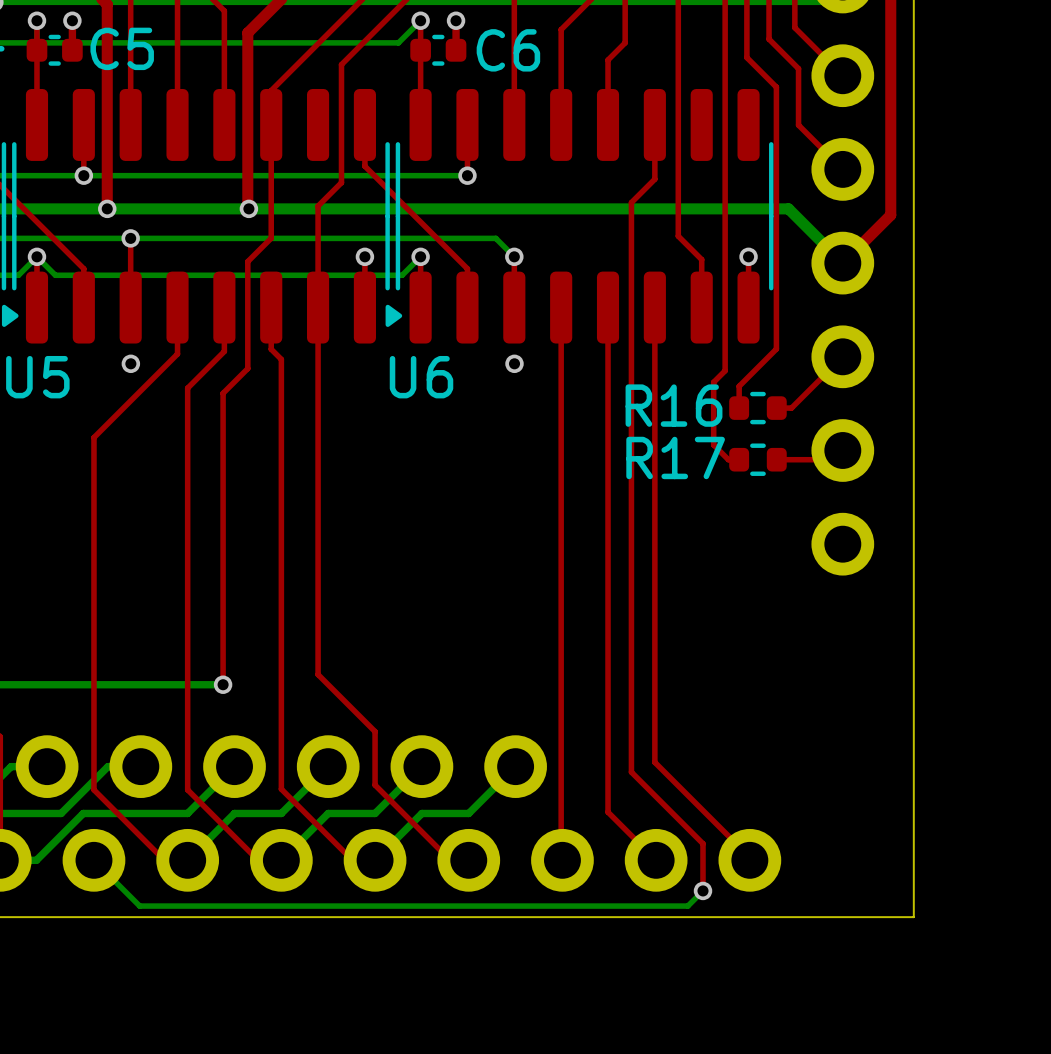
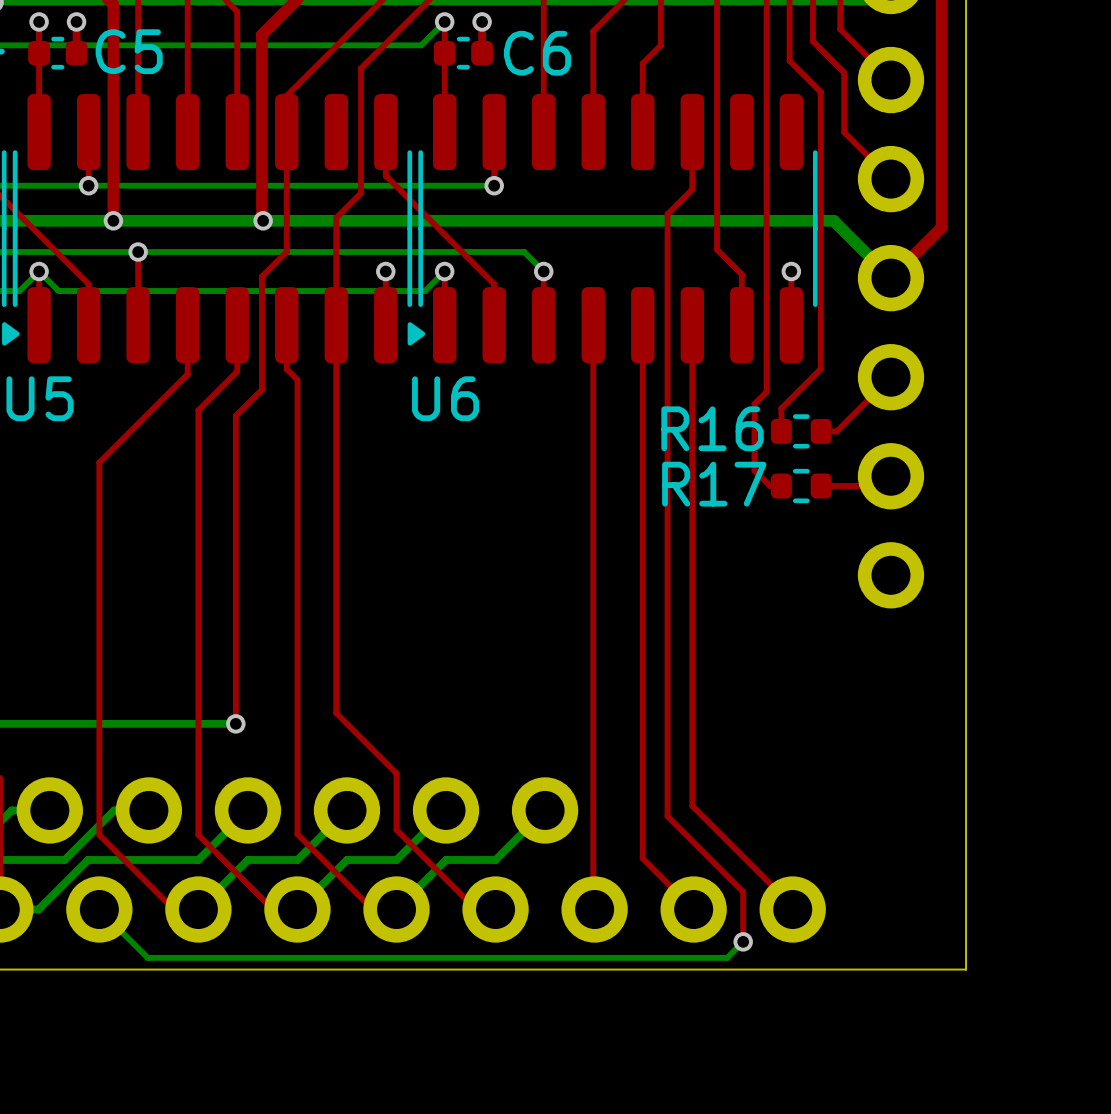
via: (130, 363) -> none
via: (514, 363) -> none

